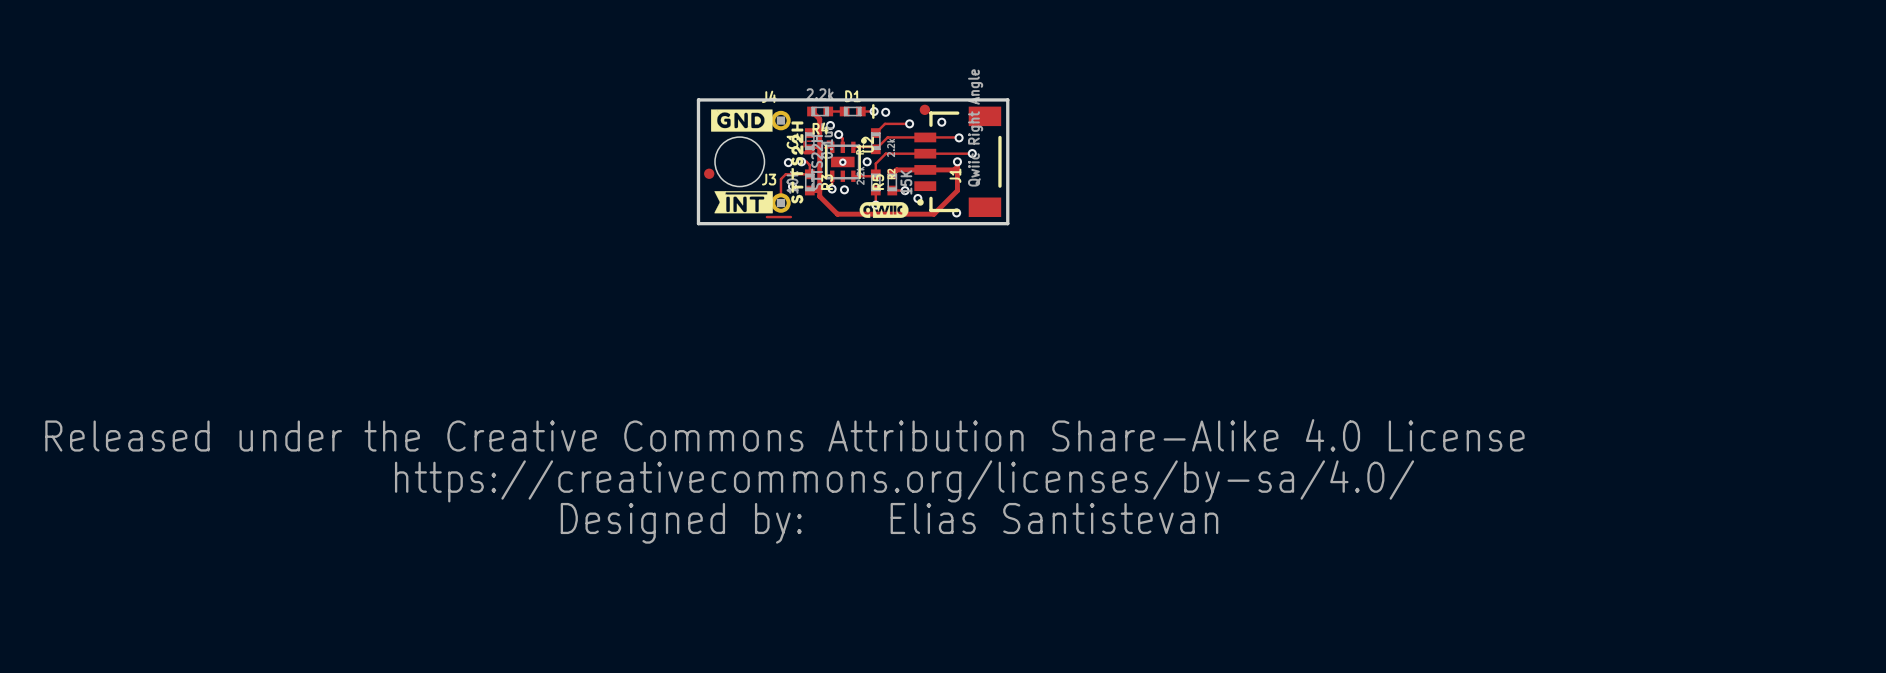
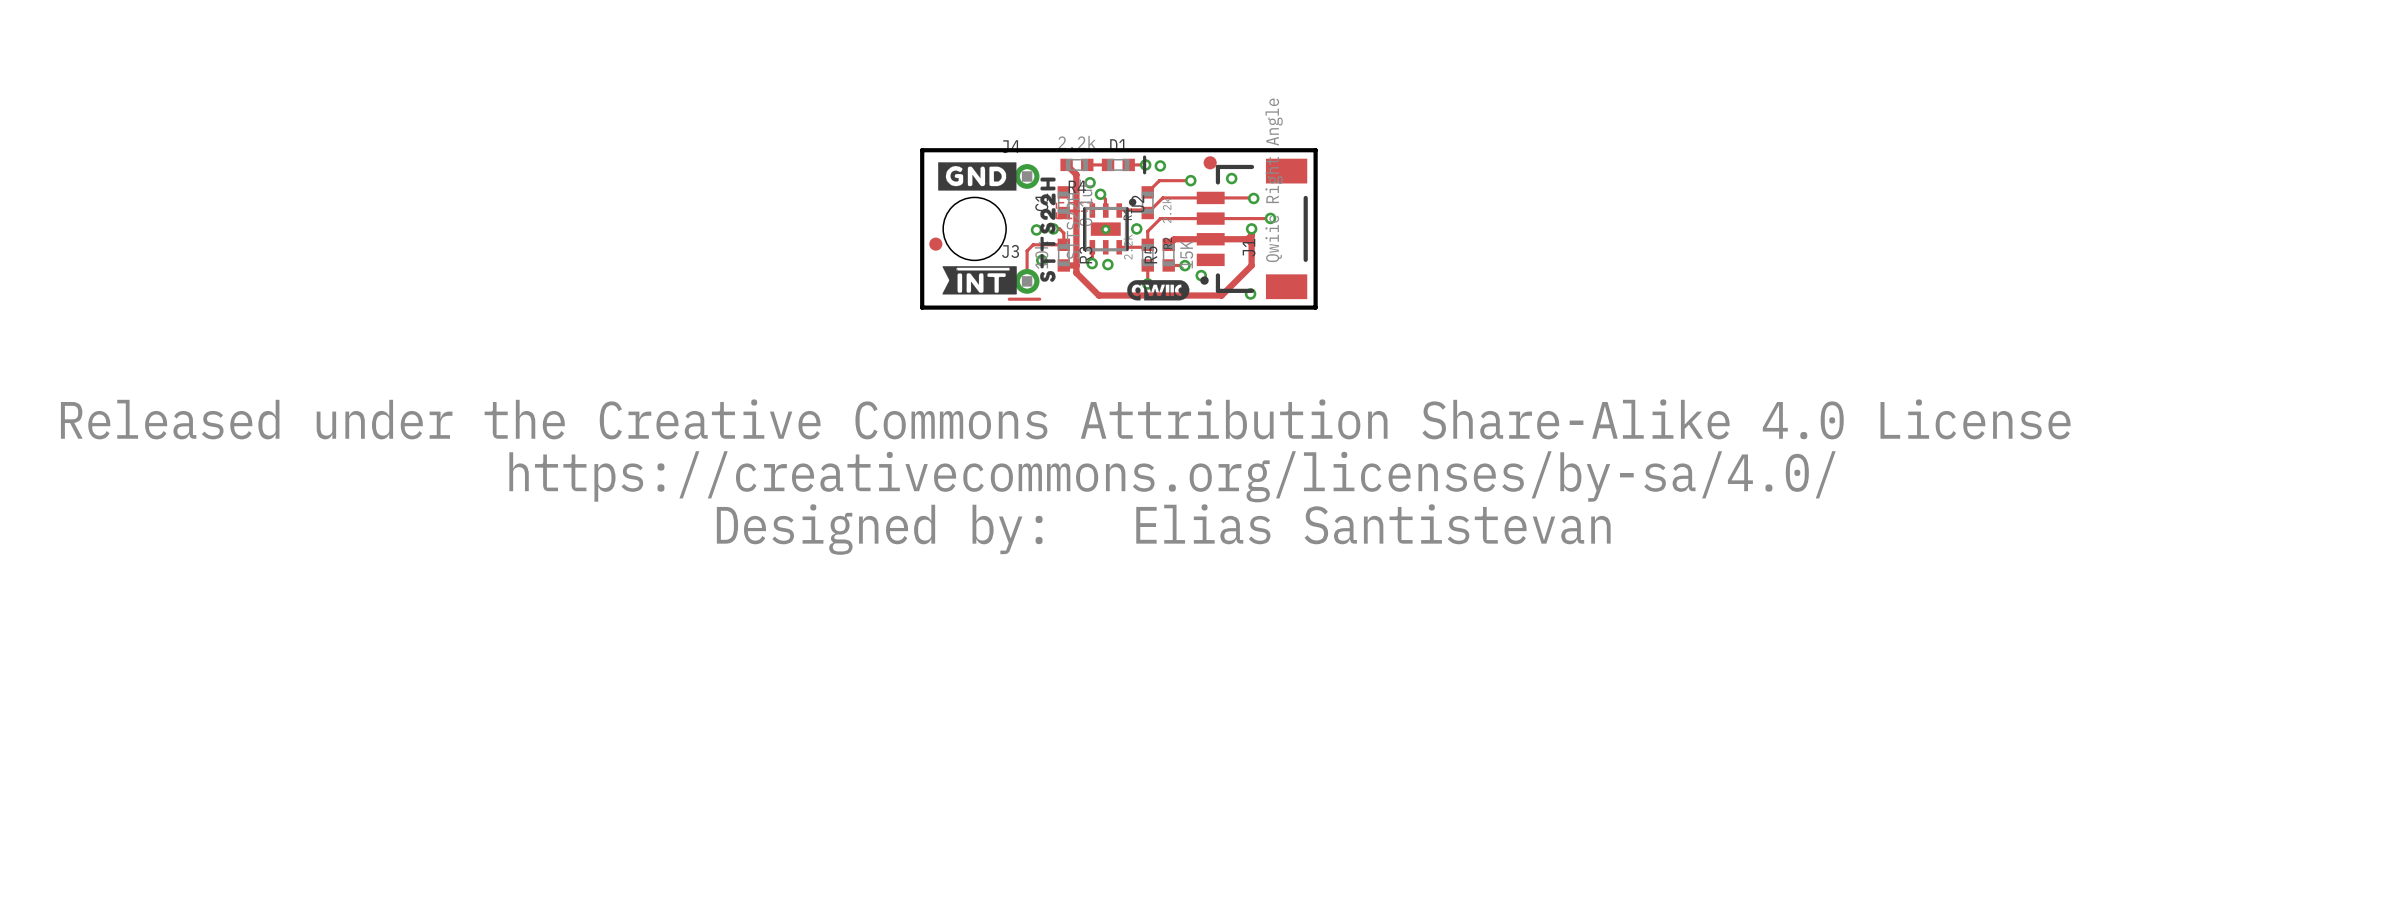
drawing position: (784, 481) -> (1065, 477)

